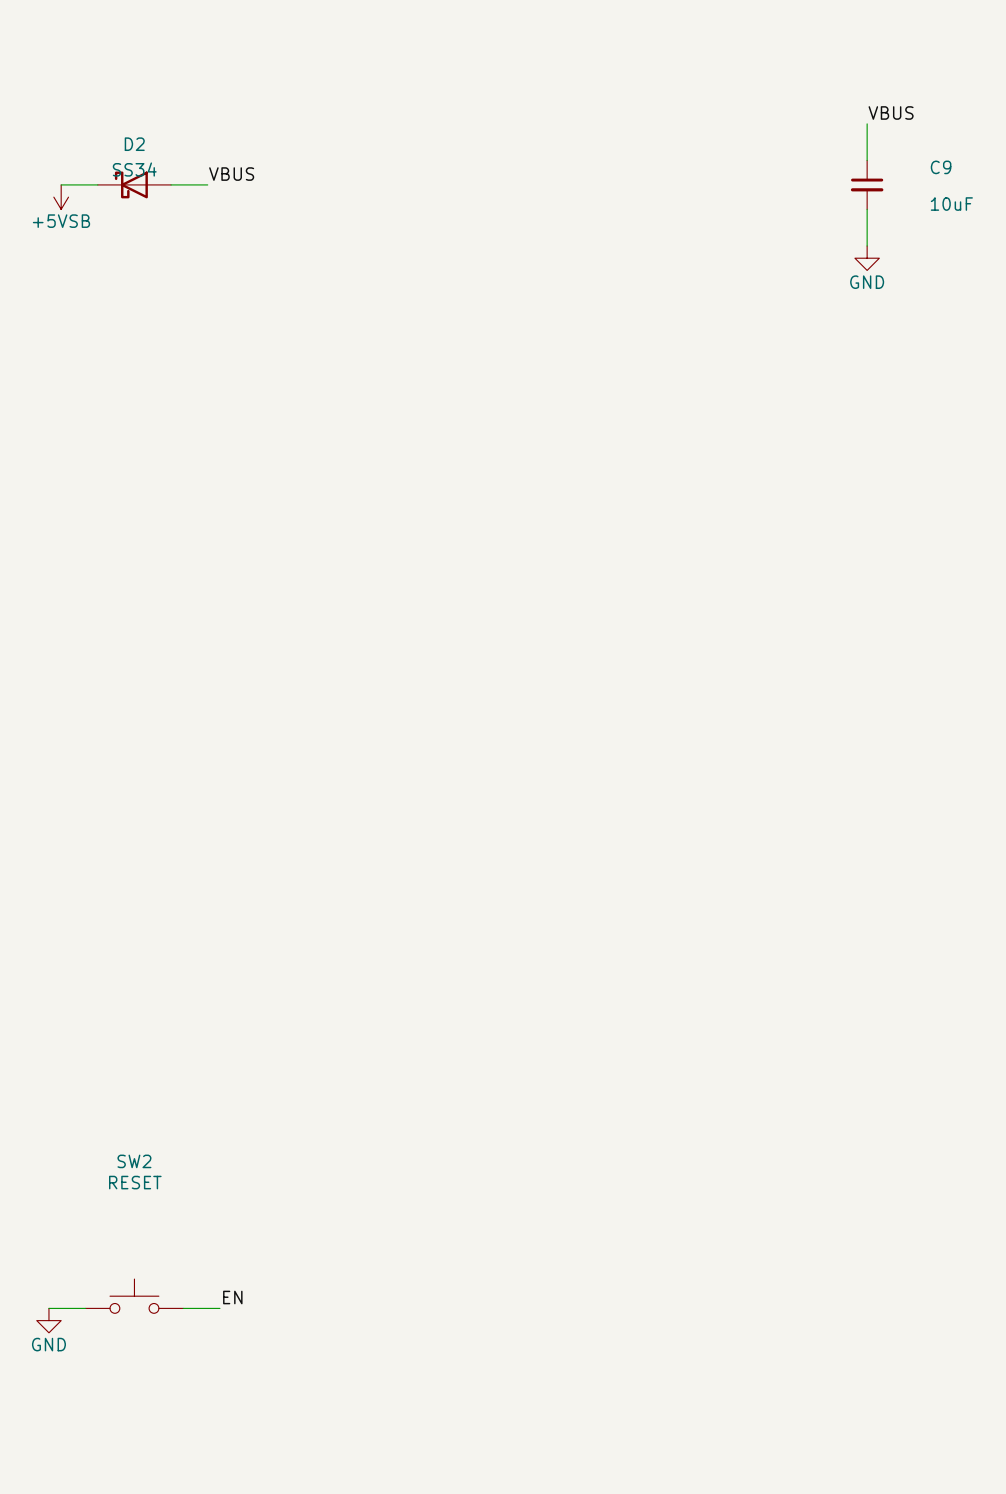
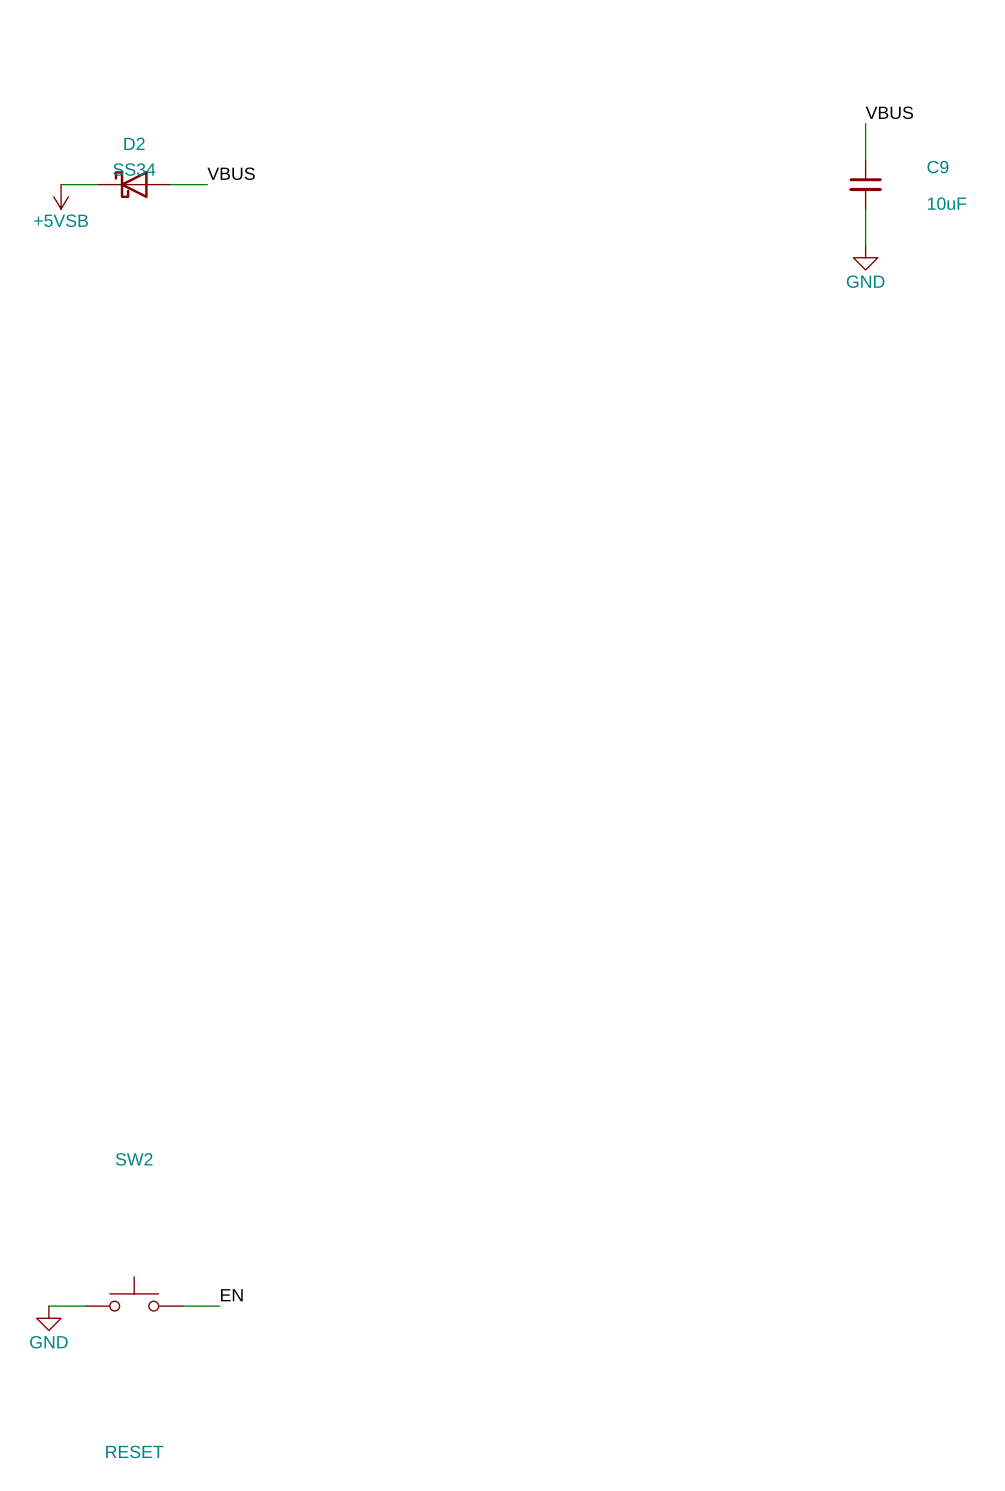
SW2 value position: RESET (135, 1182) -> RESET (134, 1451)

